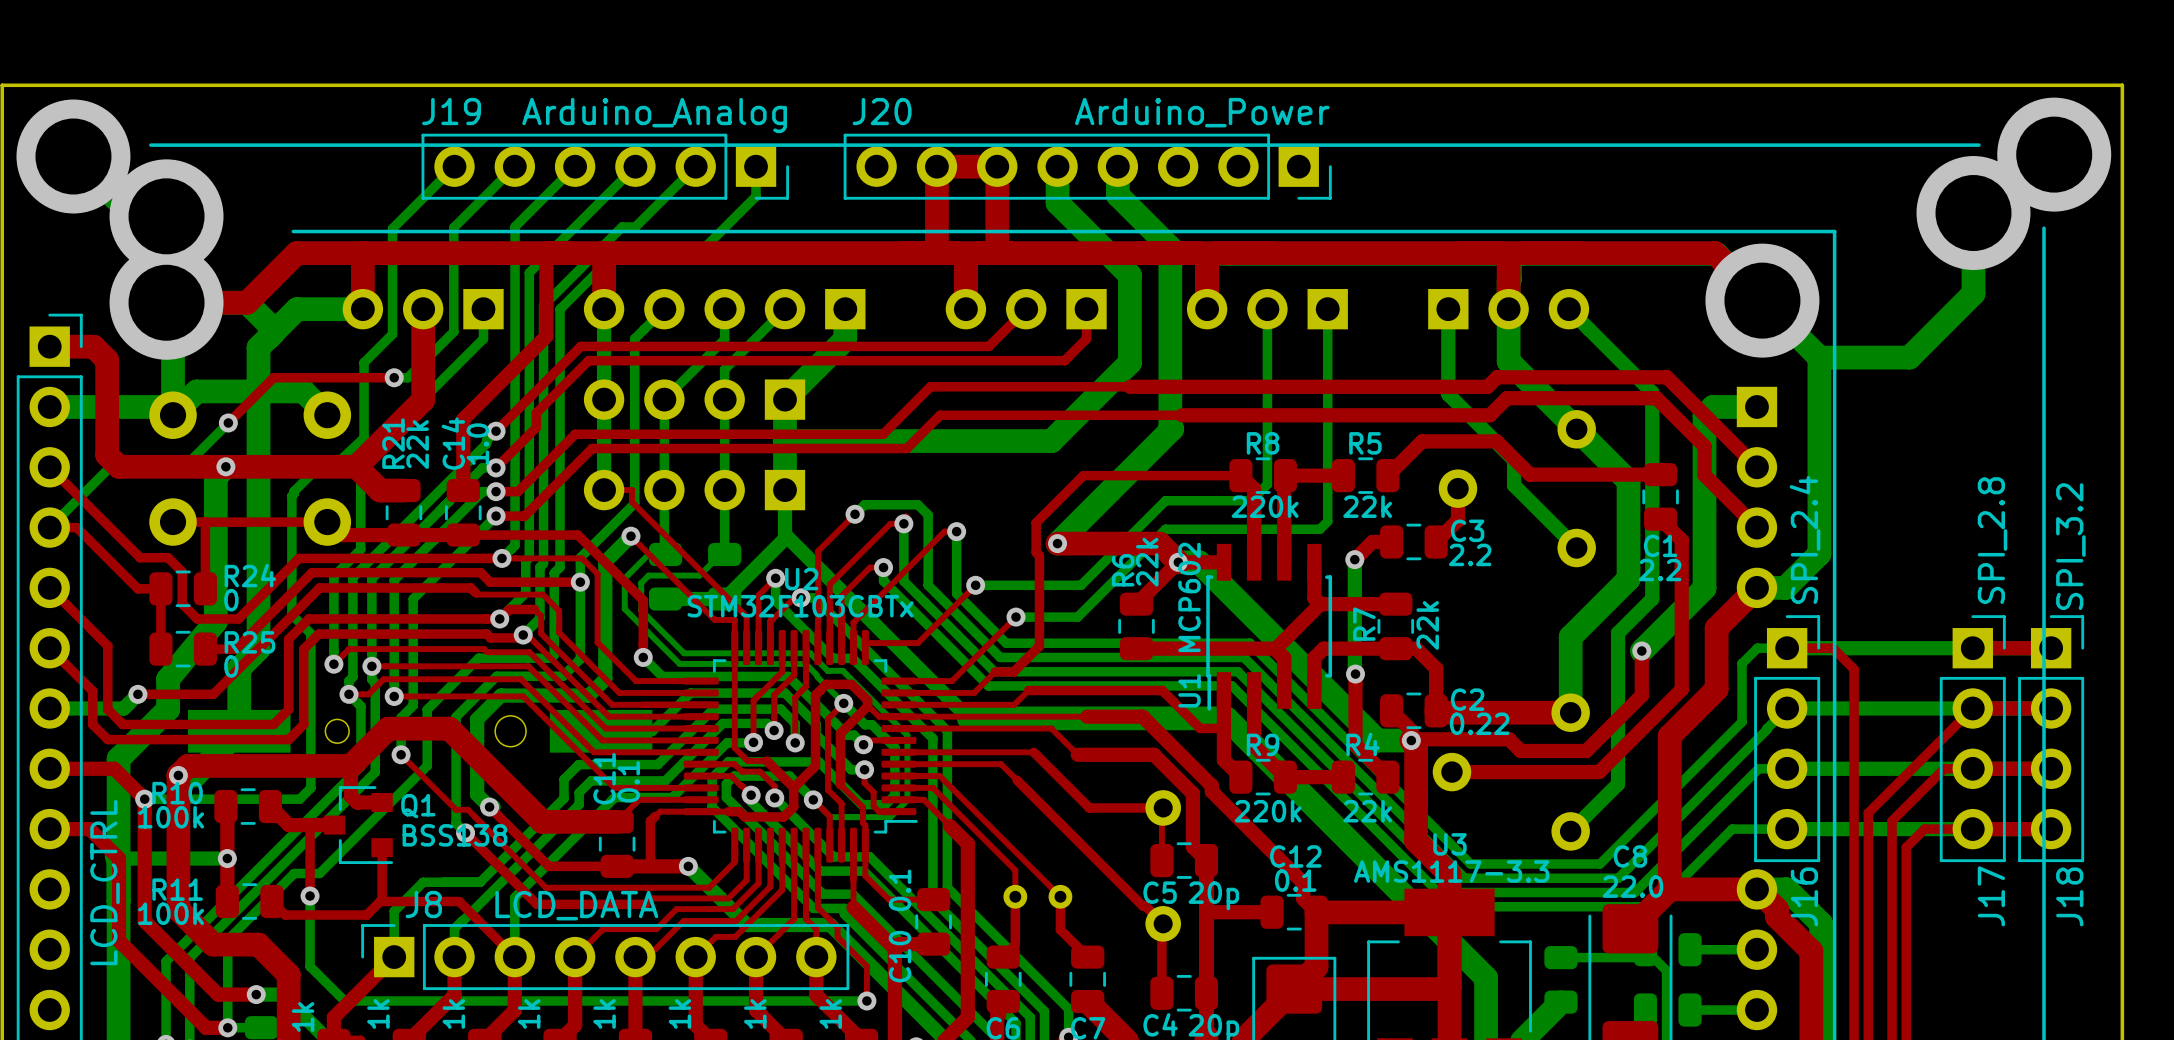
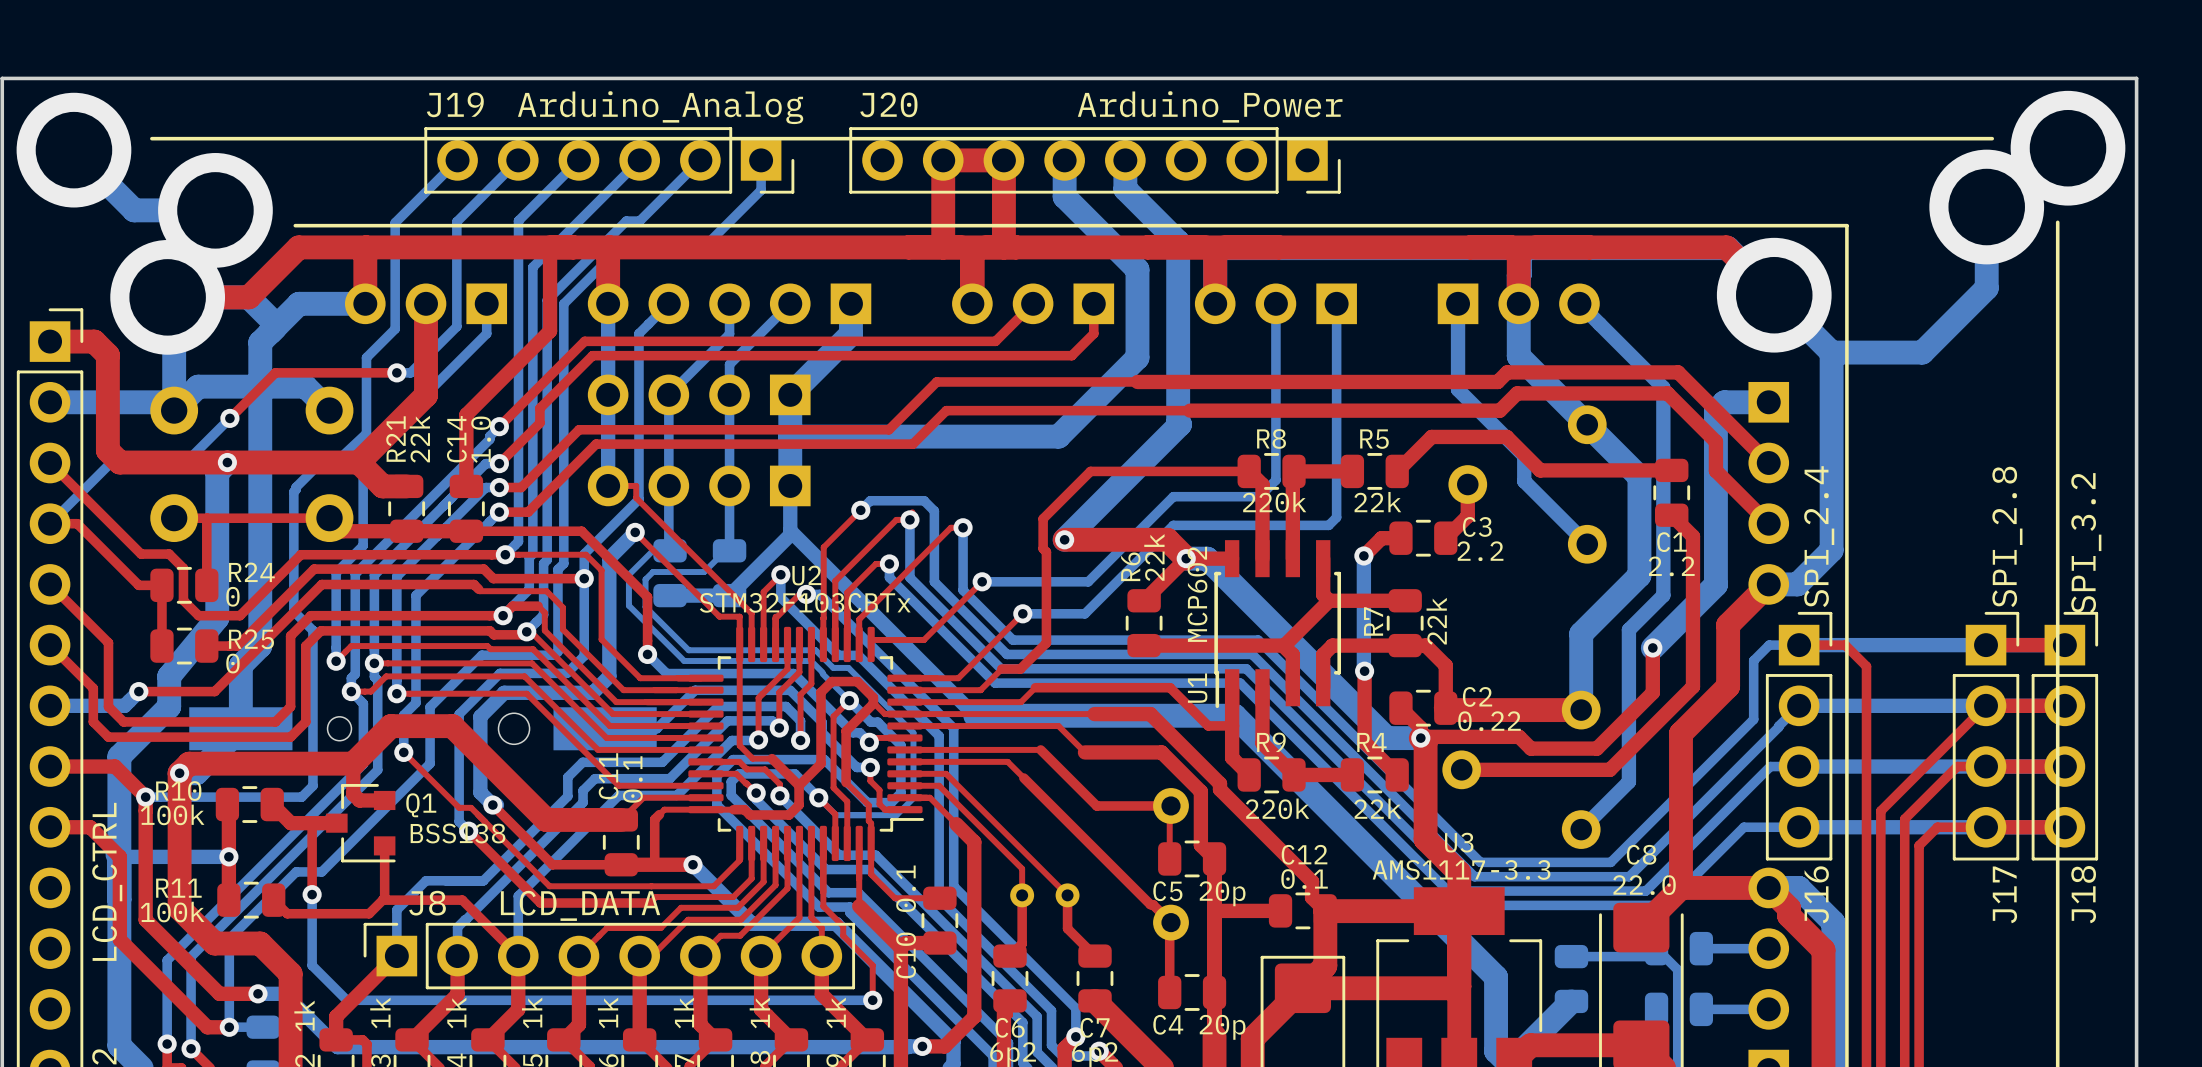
via position: (166, 216) -> (215, 210)

